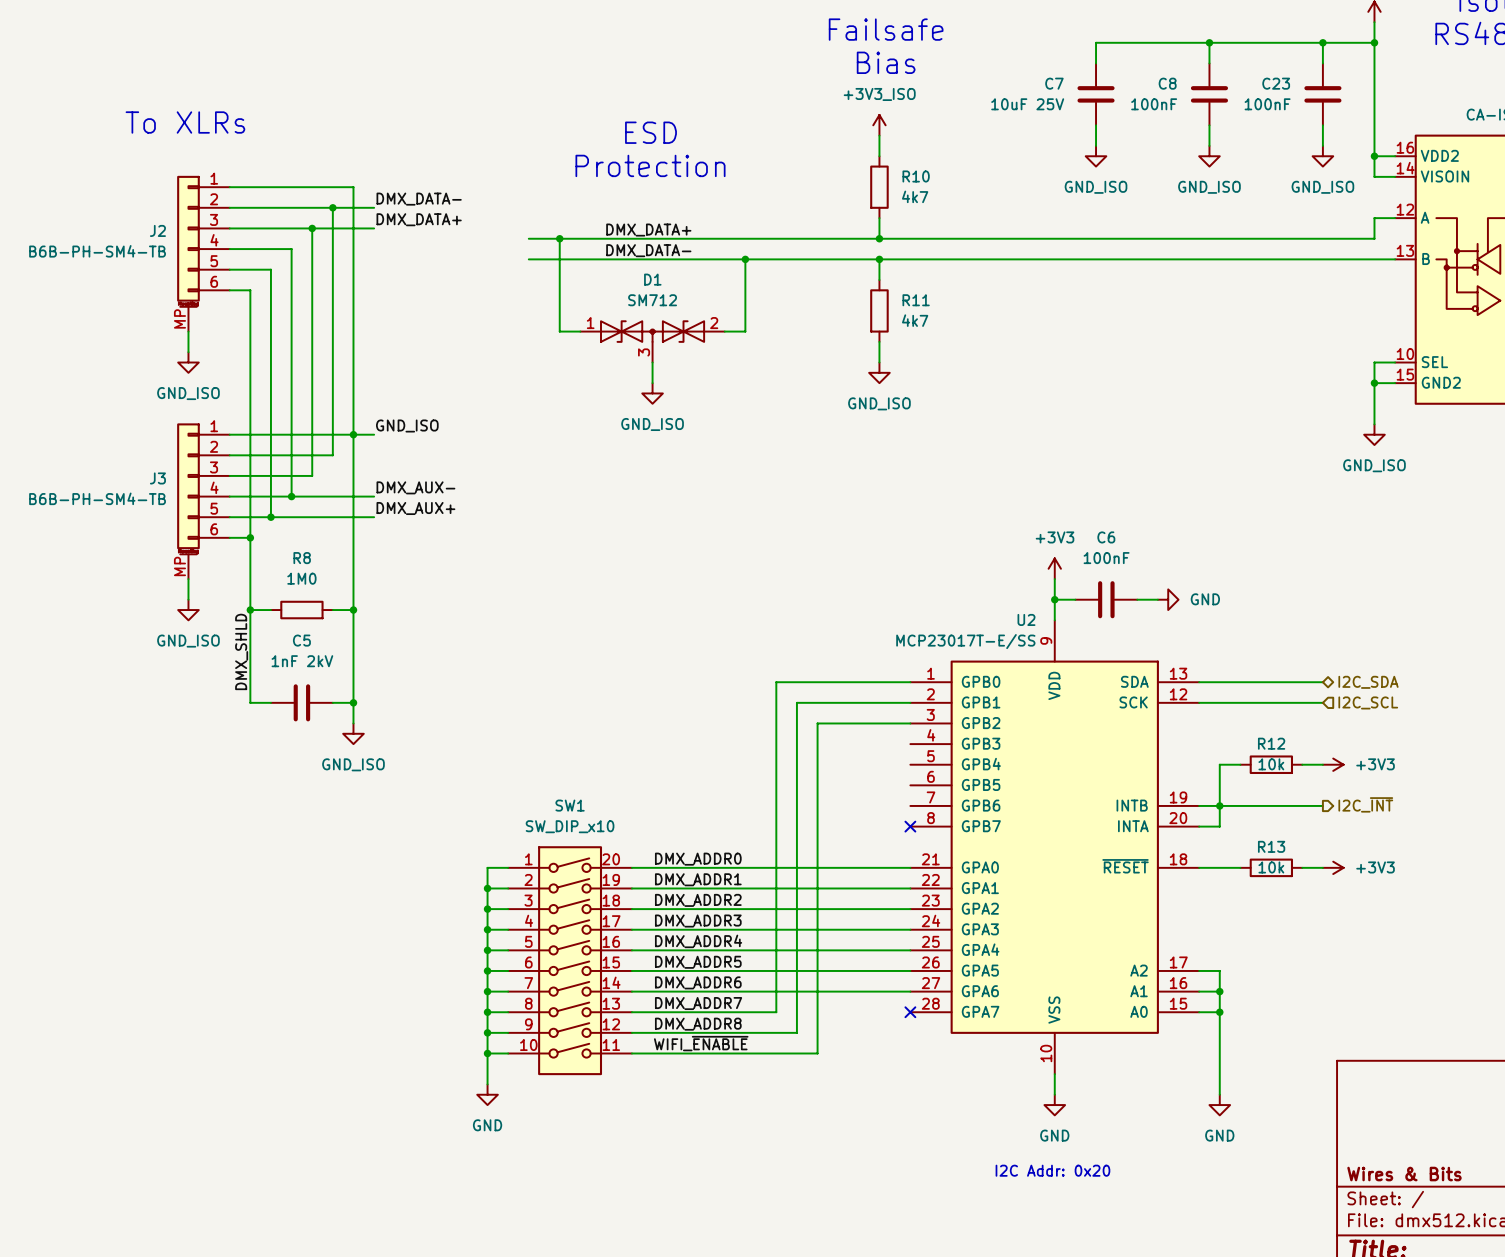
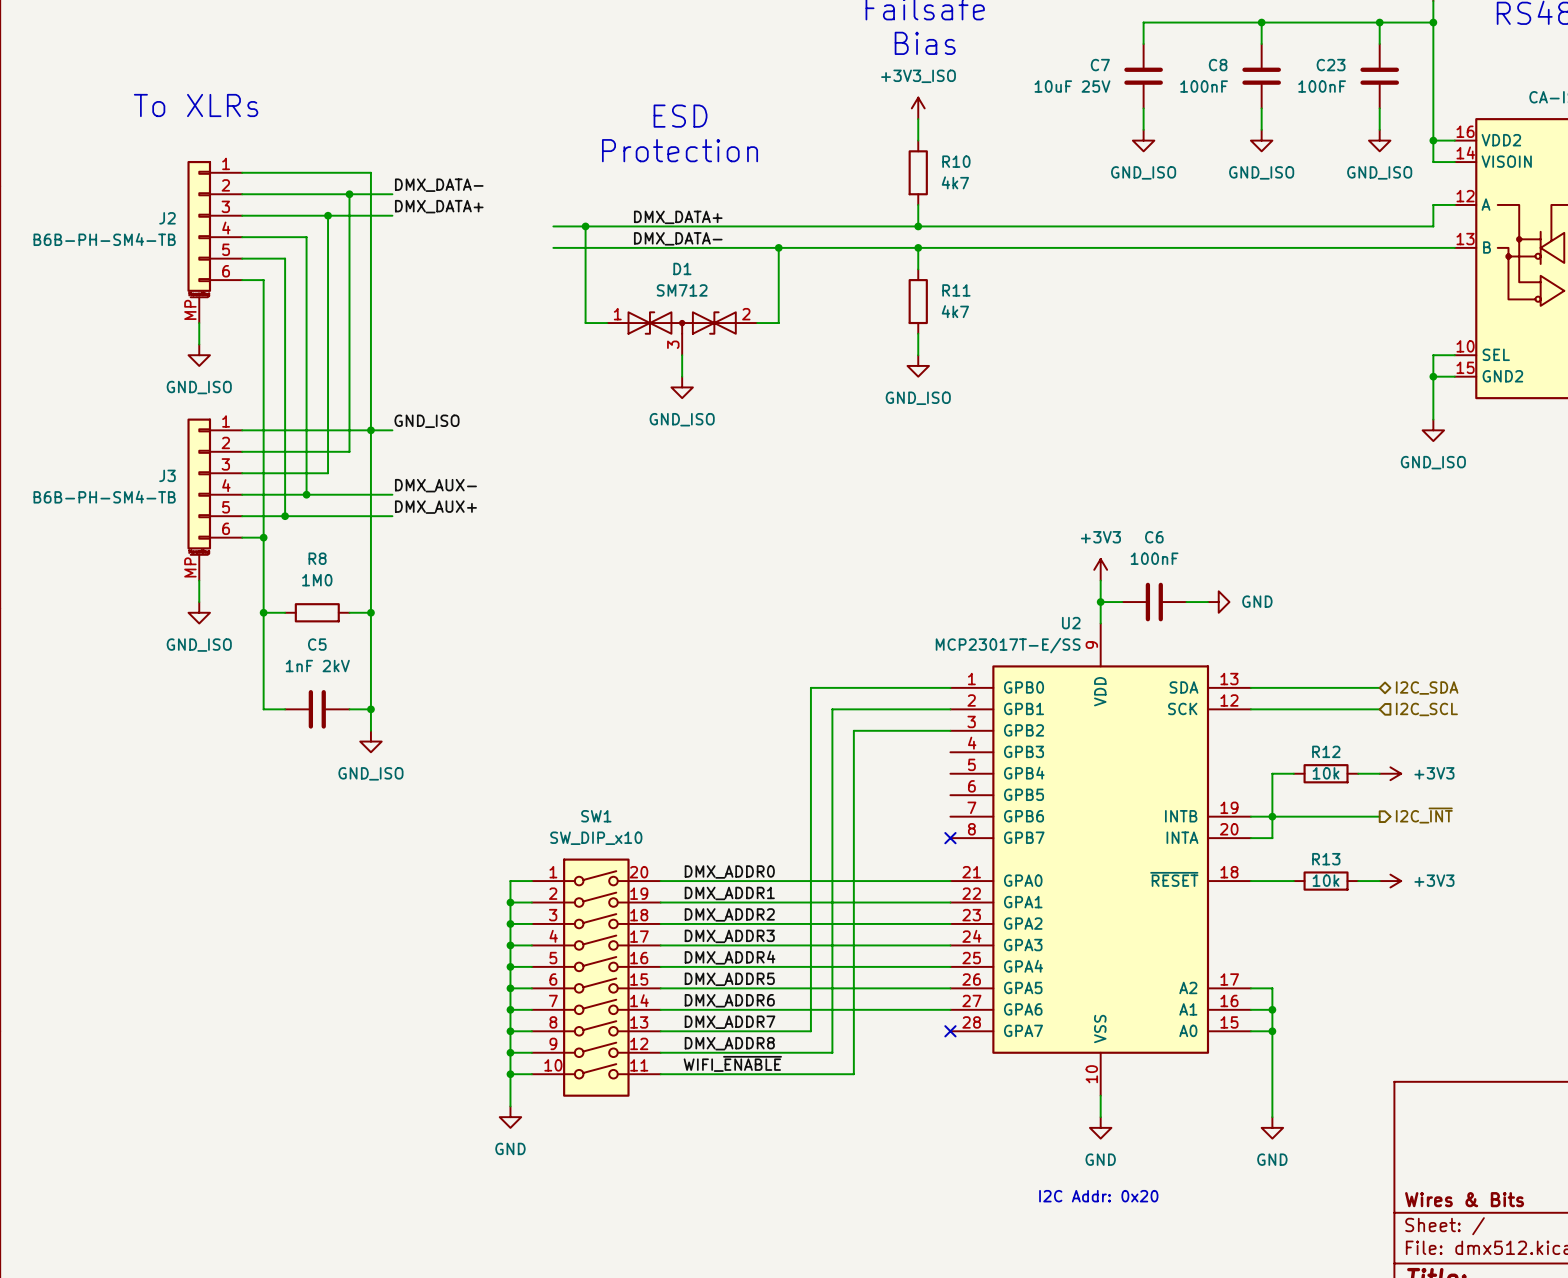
label: DMX_SHLD (241, 651) -> none

